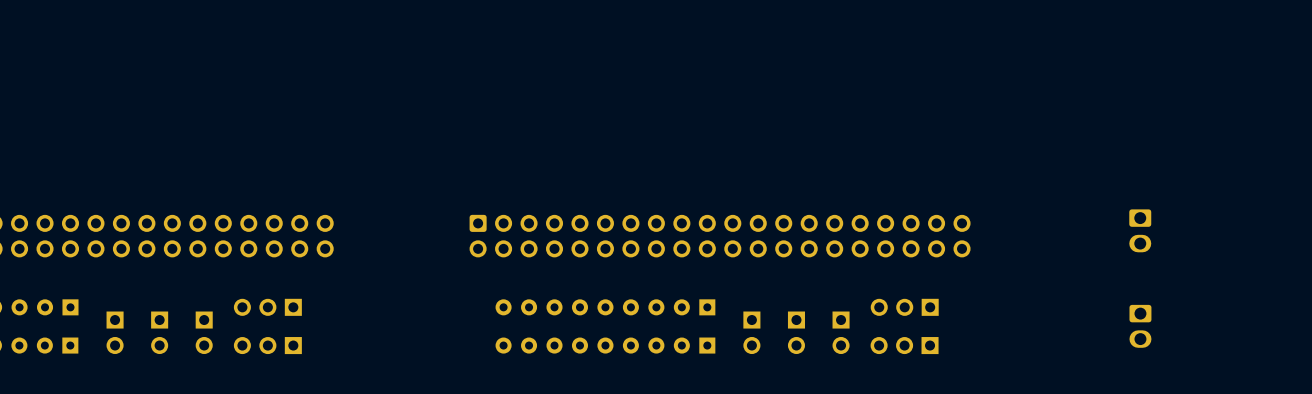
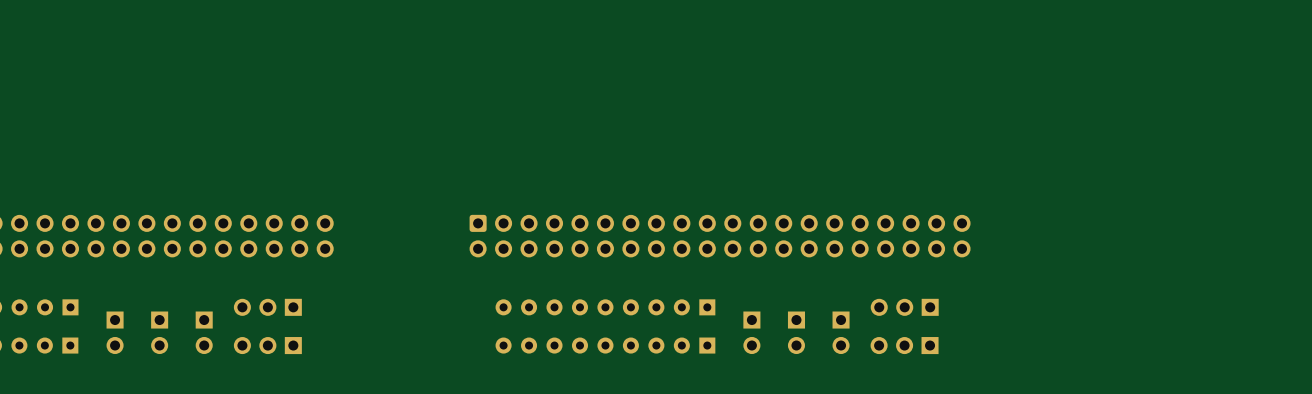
part: (1140, 230) -> none
part: (1140, 326) -> none

